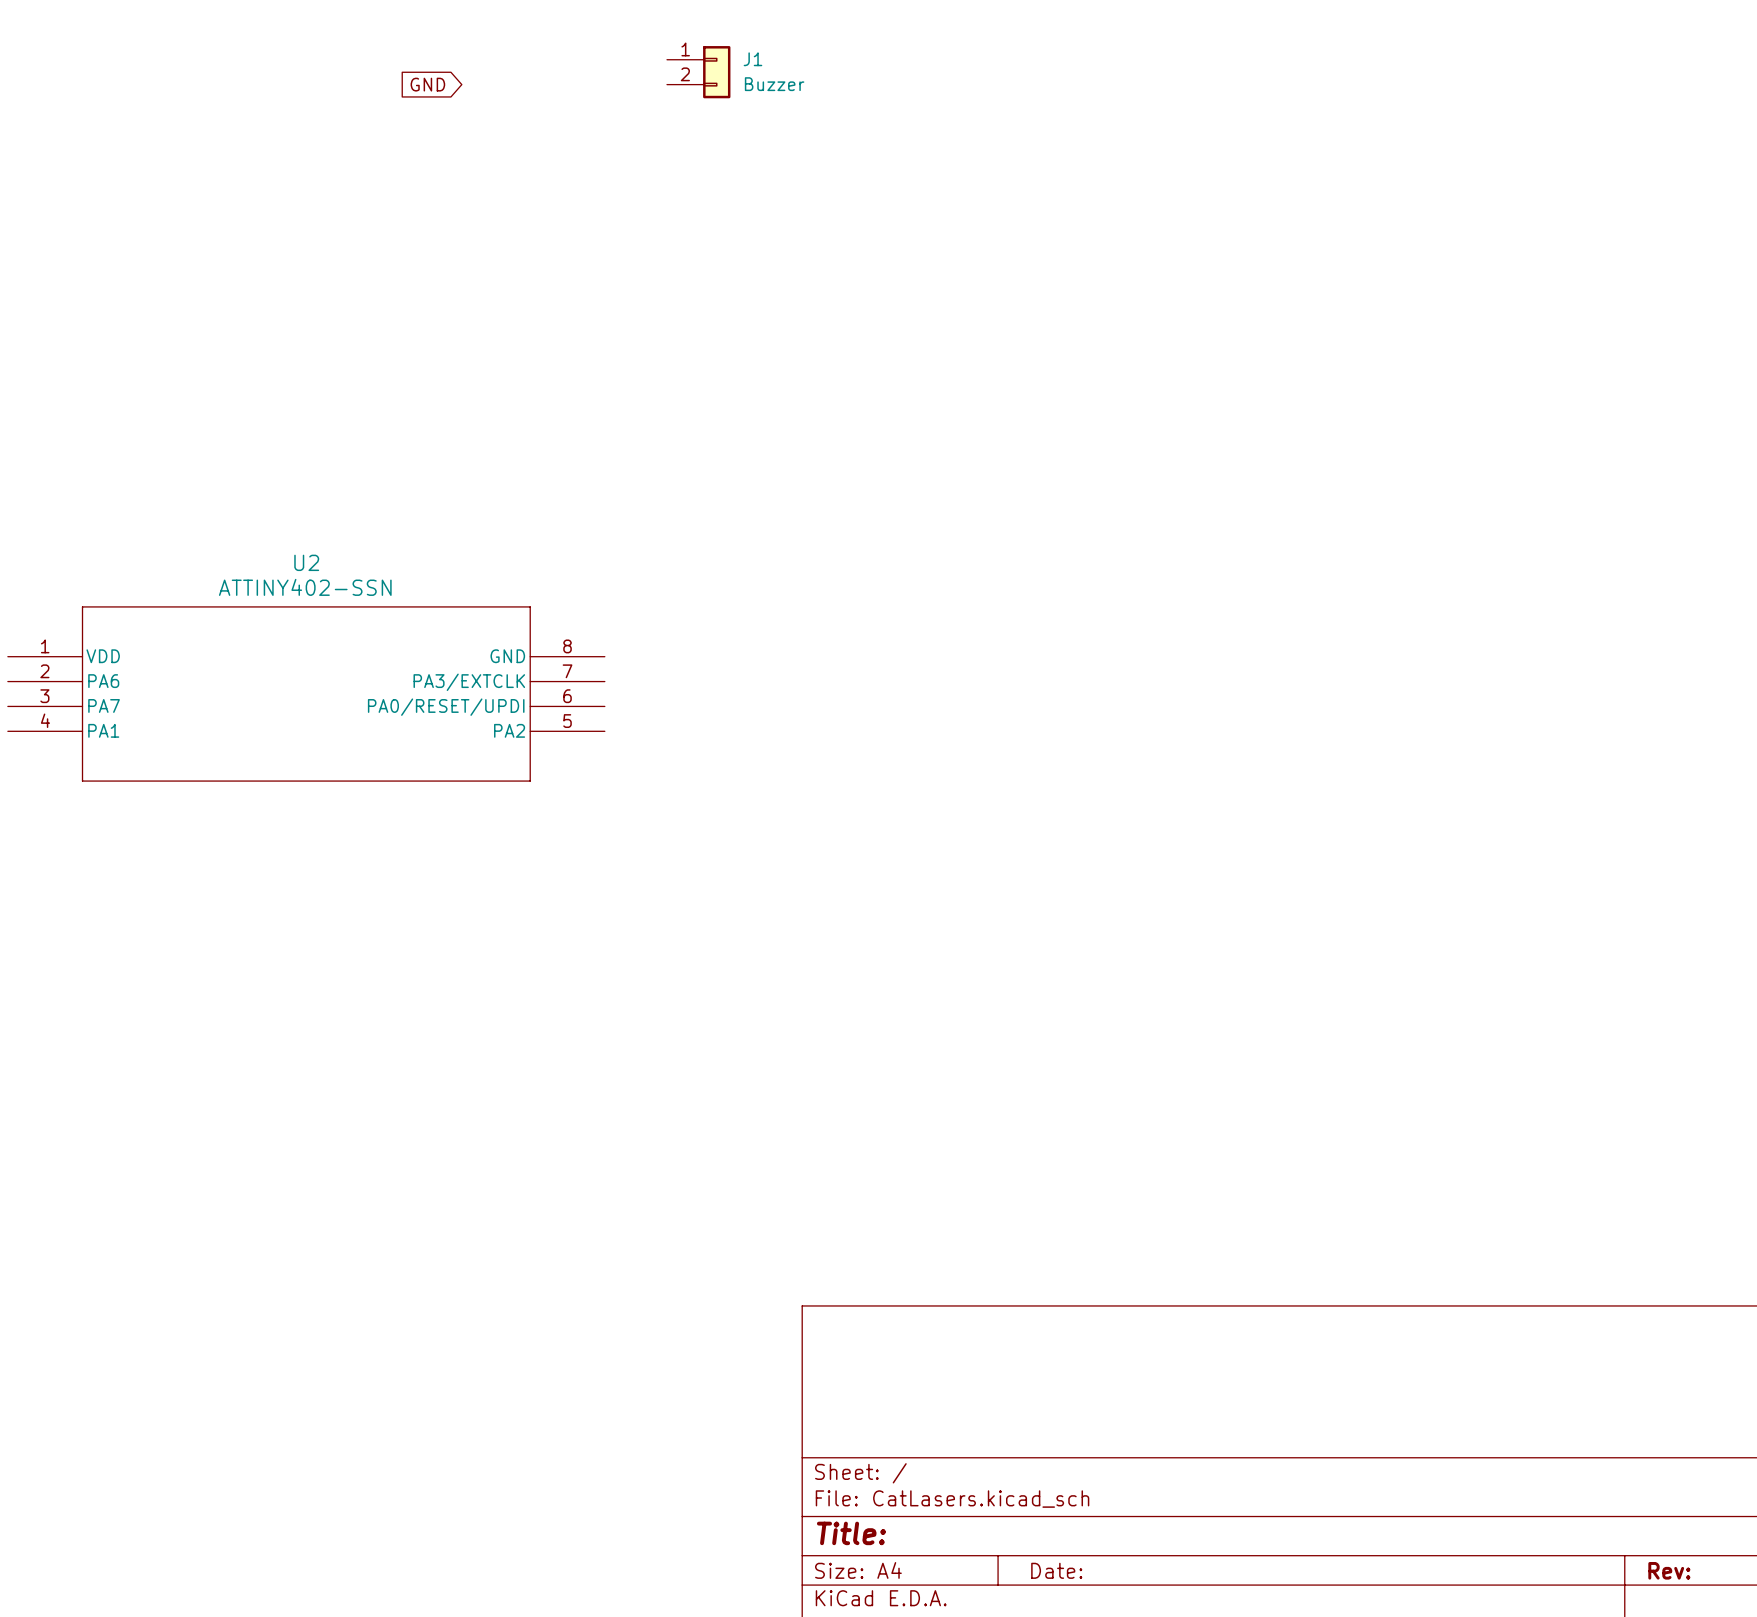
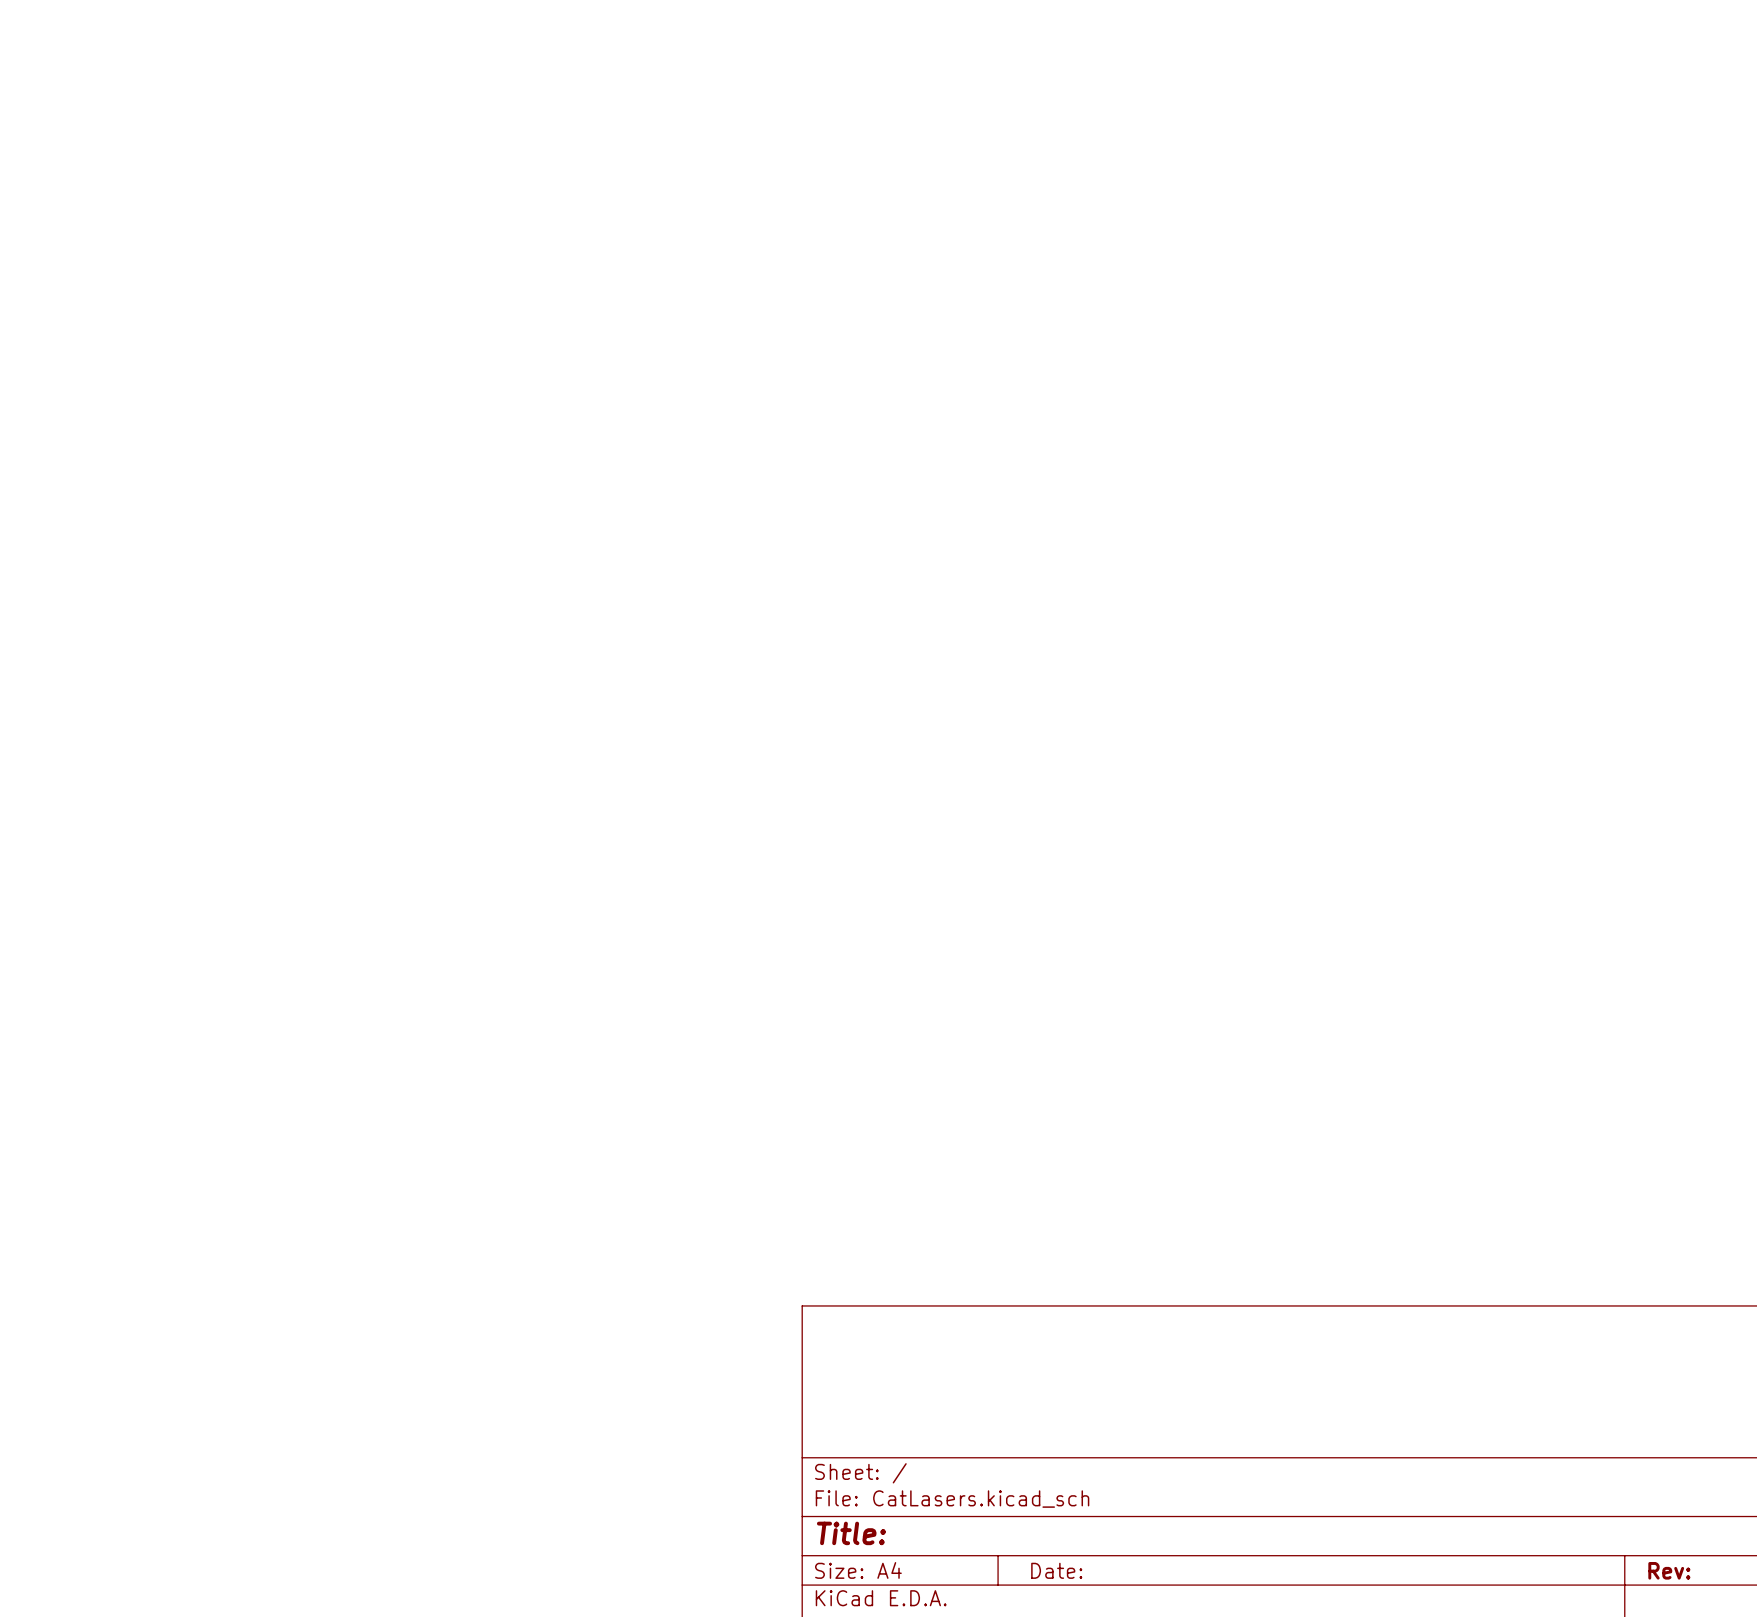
J1: Buzzer (698, 72) -> none
global label: GND (427, 84) -> none
U2: ATTINY402-SSN (306, 694) -> none

